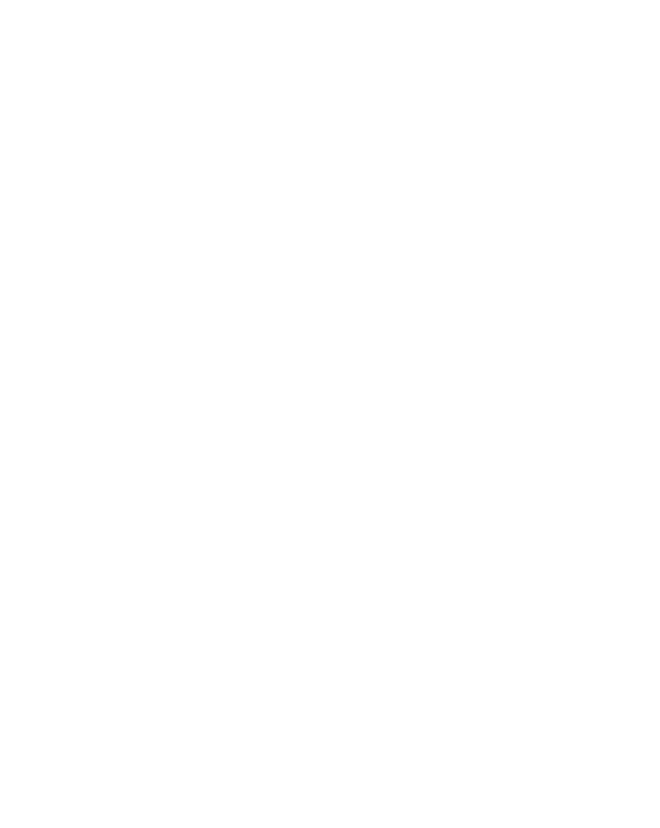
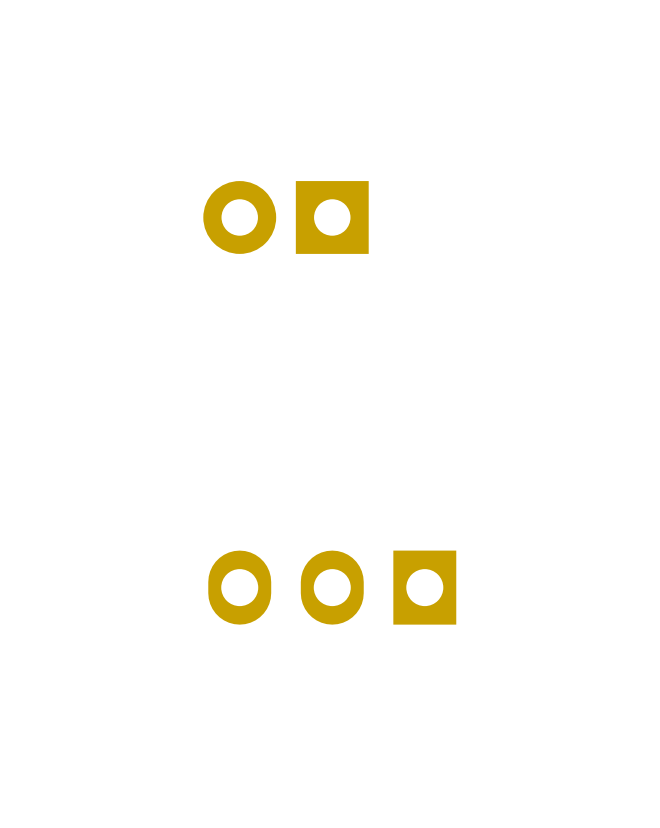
part: none -> (286, 217)
part: none -> (332, 587)

